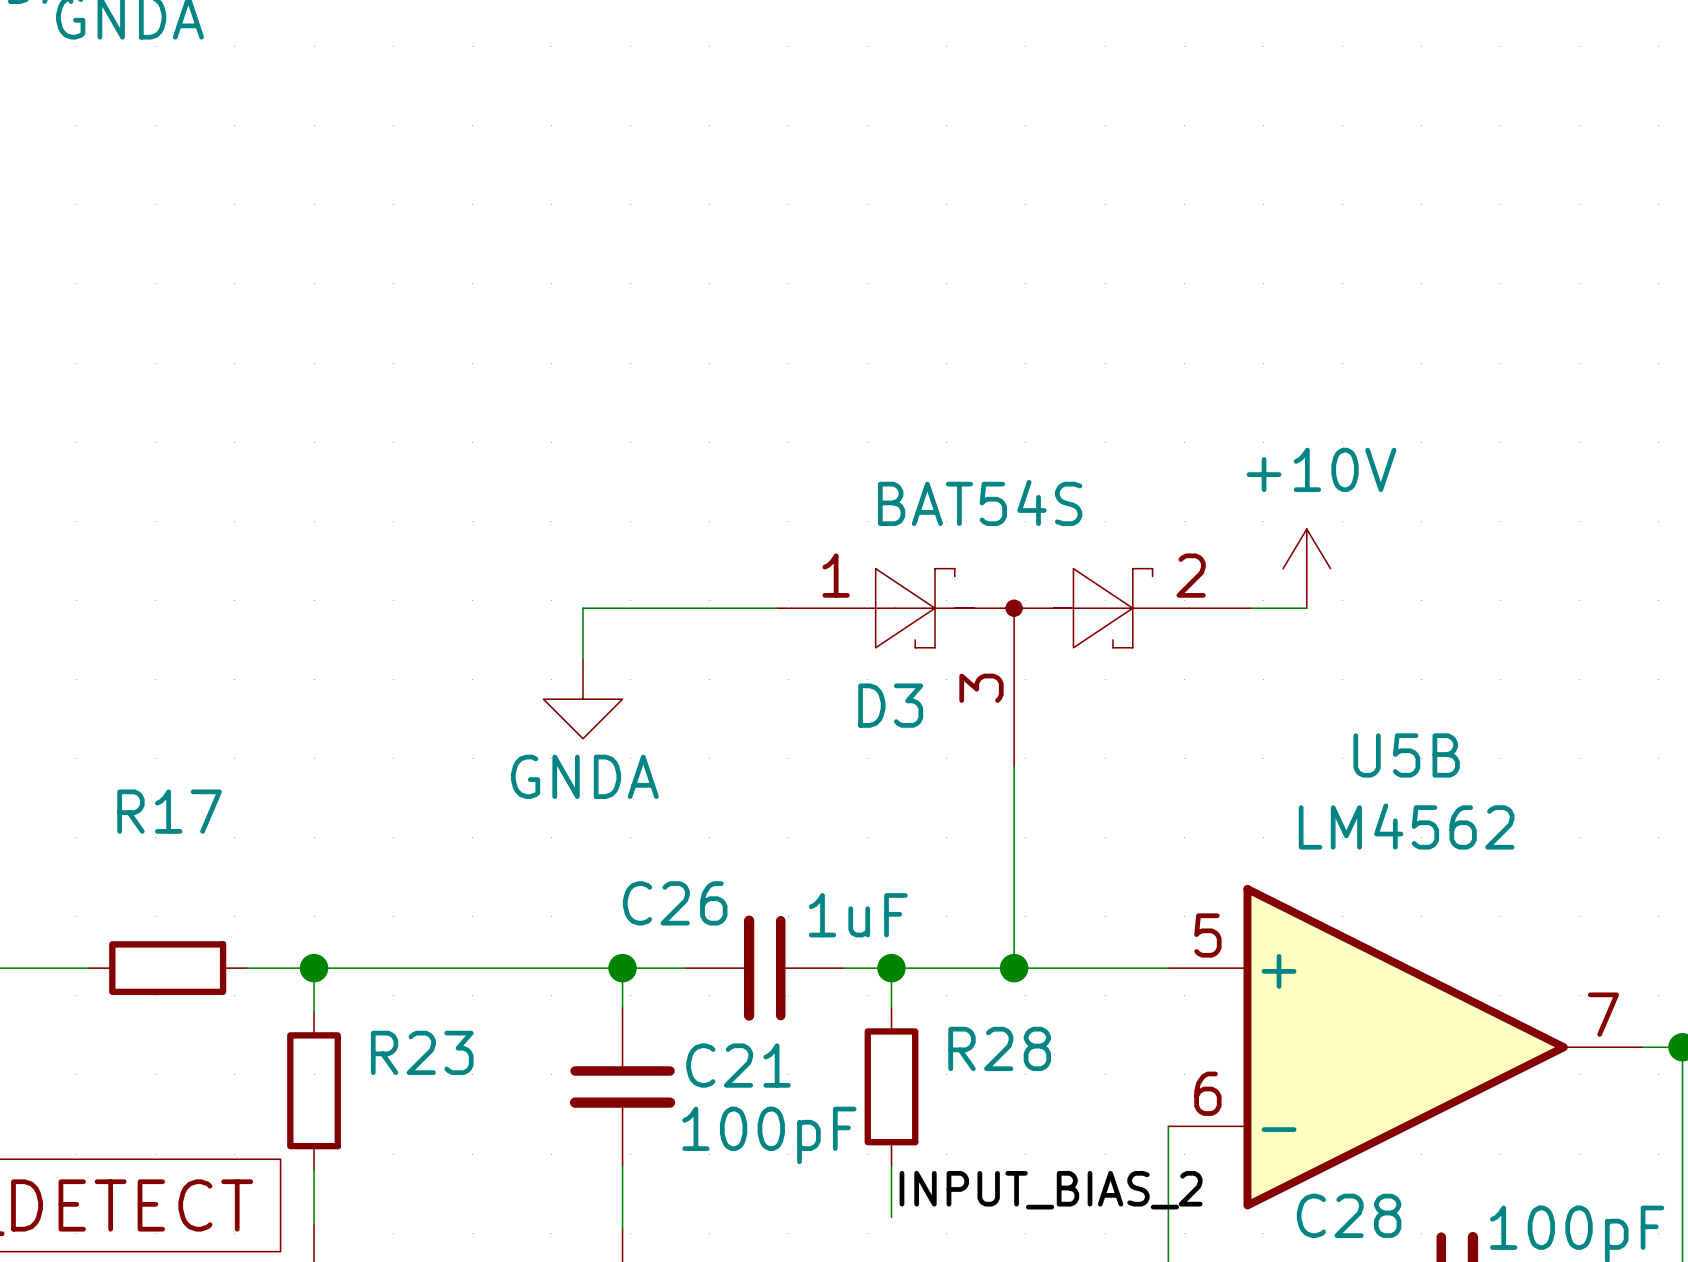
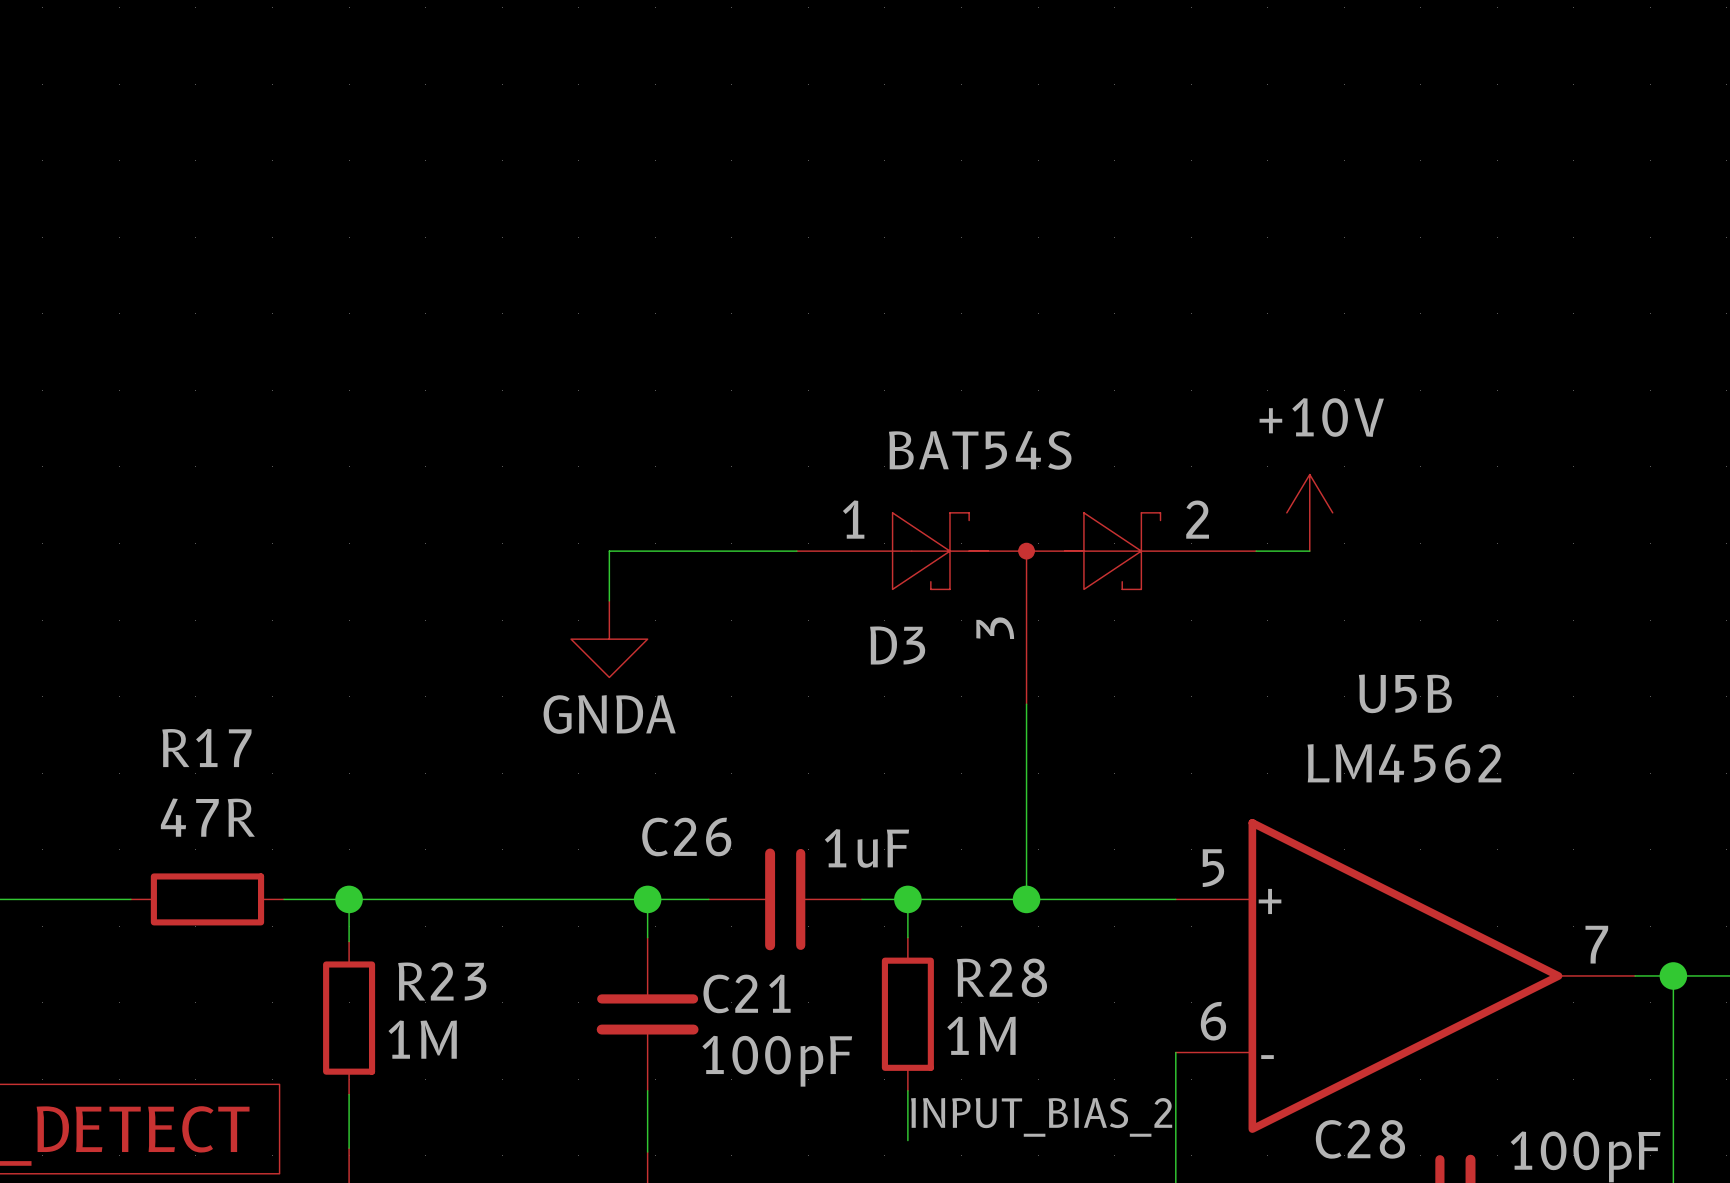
R17 value: none -> 47R (207, 817)
R28 value: none -> 1M (981, 1035)
R23 value: none -> 1M (422, 1039)

